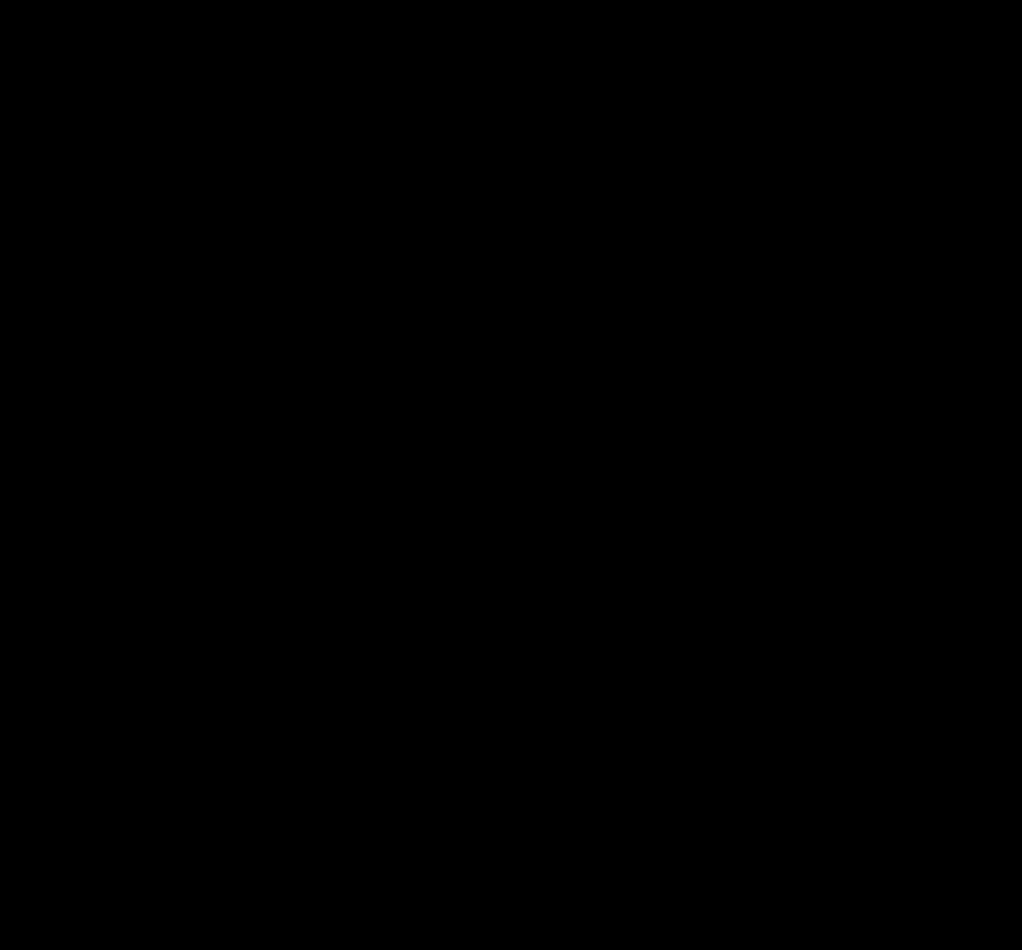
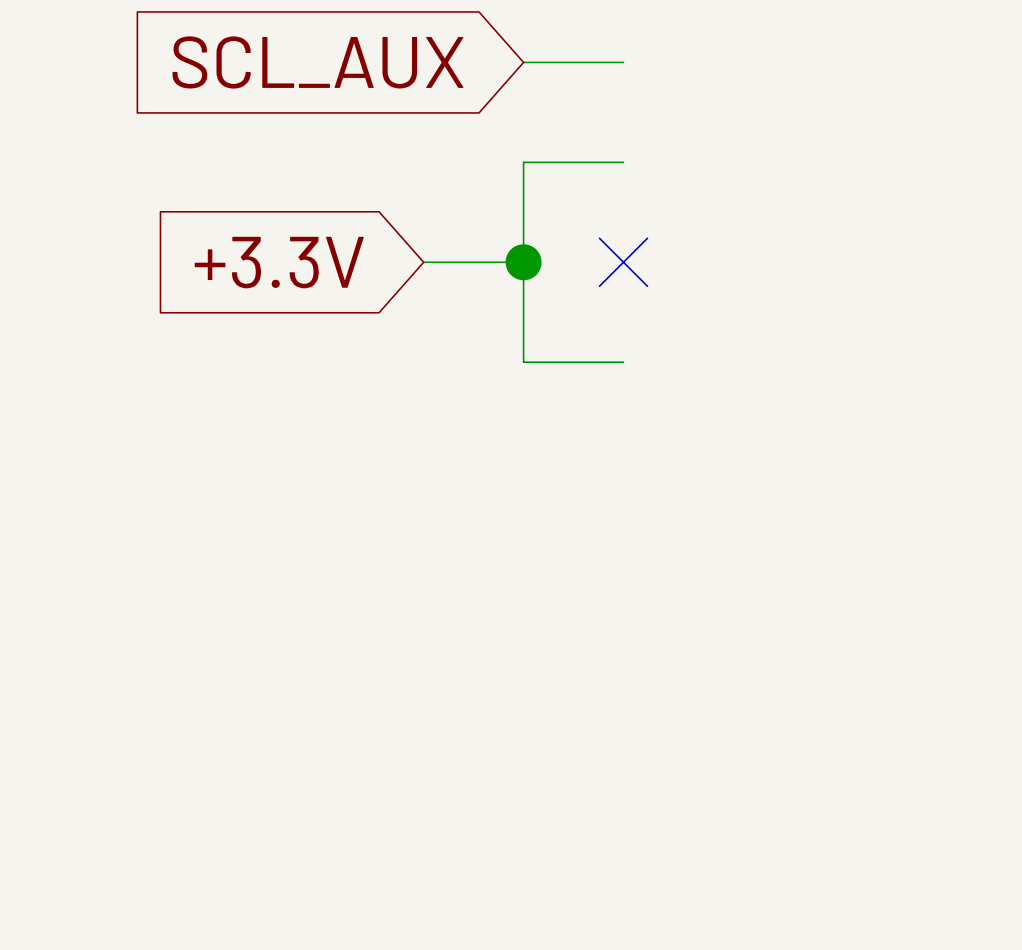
global label: none -> SCL_AUX (318, 62)
wire: none -> (523, 62) (623, 62)
wire: none -> (623, 162) (523, 162) (523, 362) (623, 362)
global label: none -> +3.3V (279, 262)
wire: none -> (423, 262) (523, 262)
junction: none -> (523, 262)
no-connect mark: none -> (623, 262)

